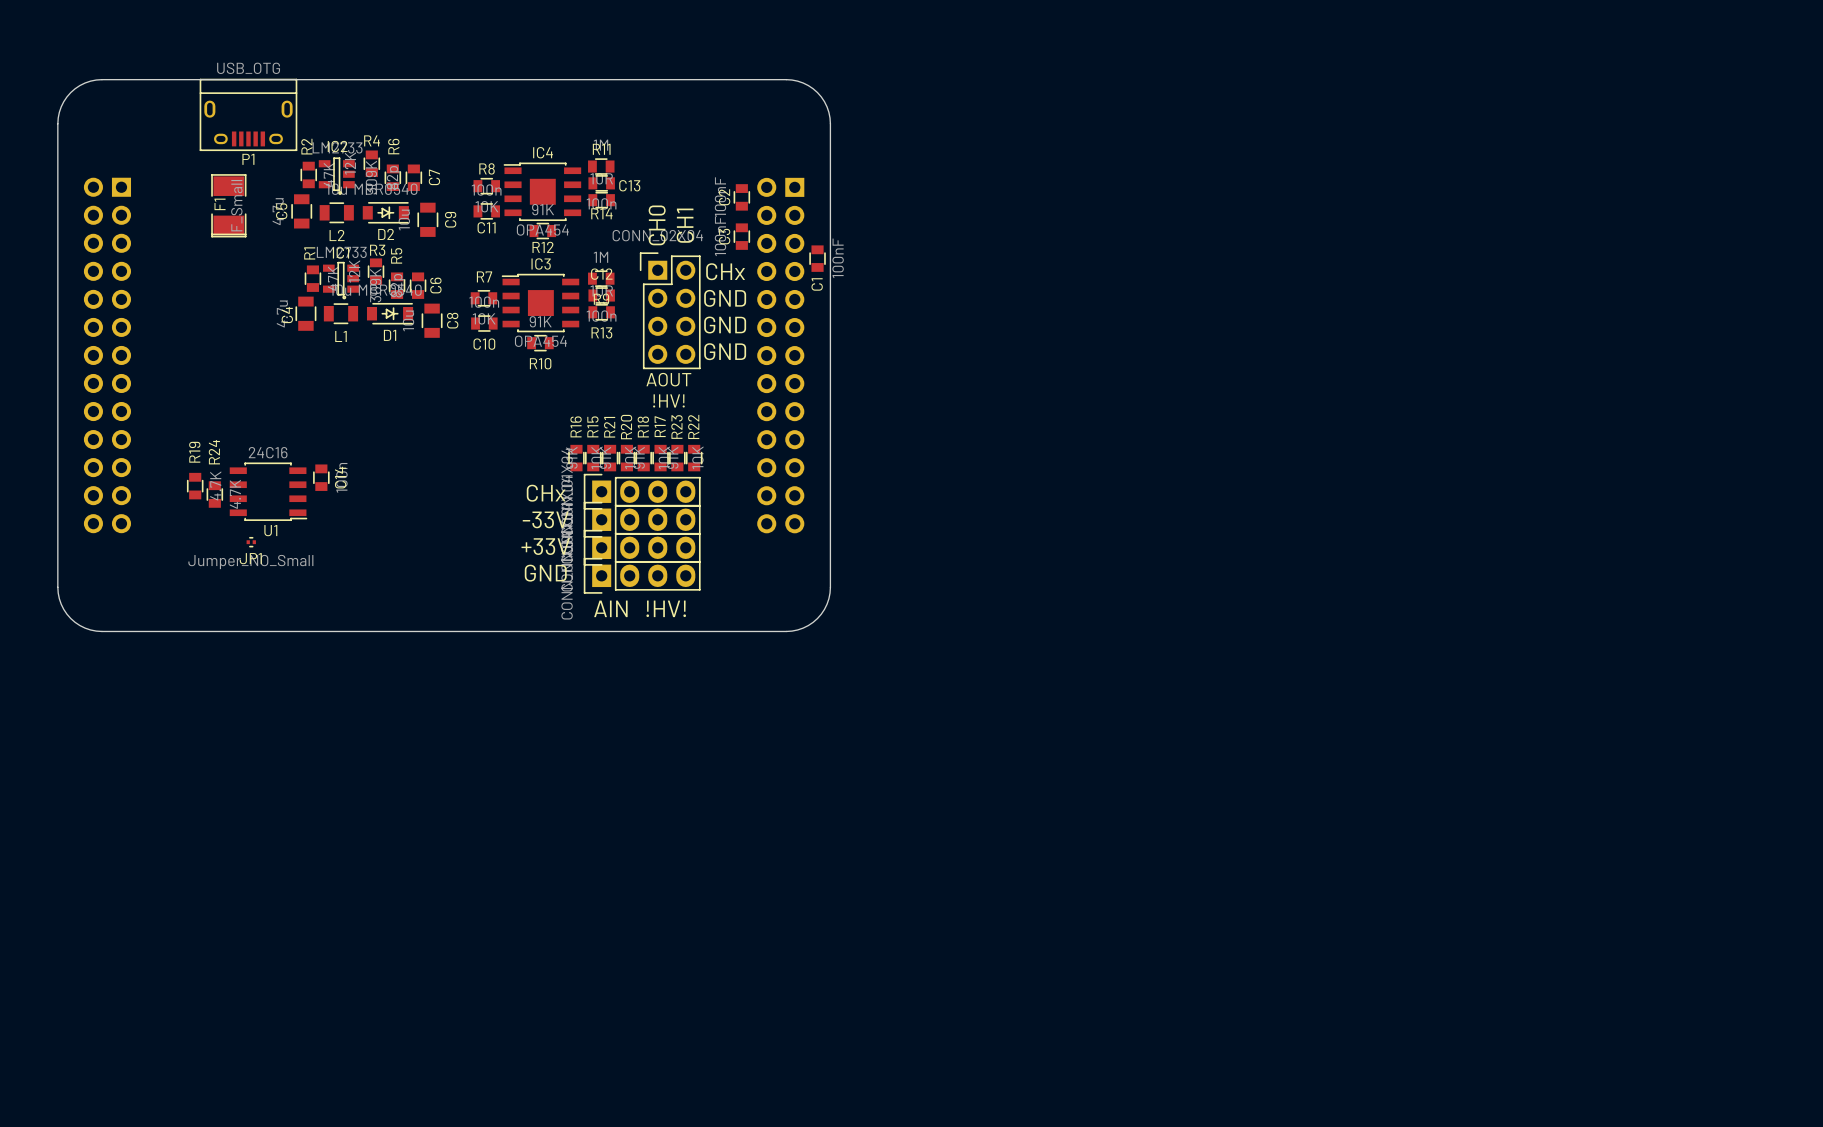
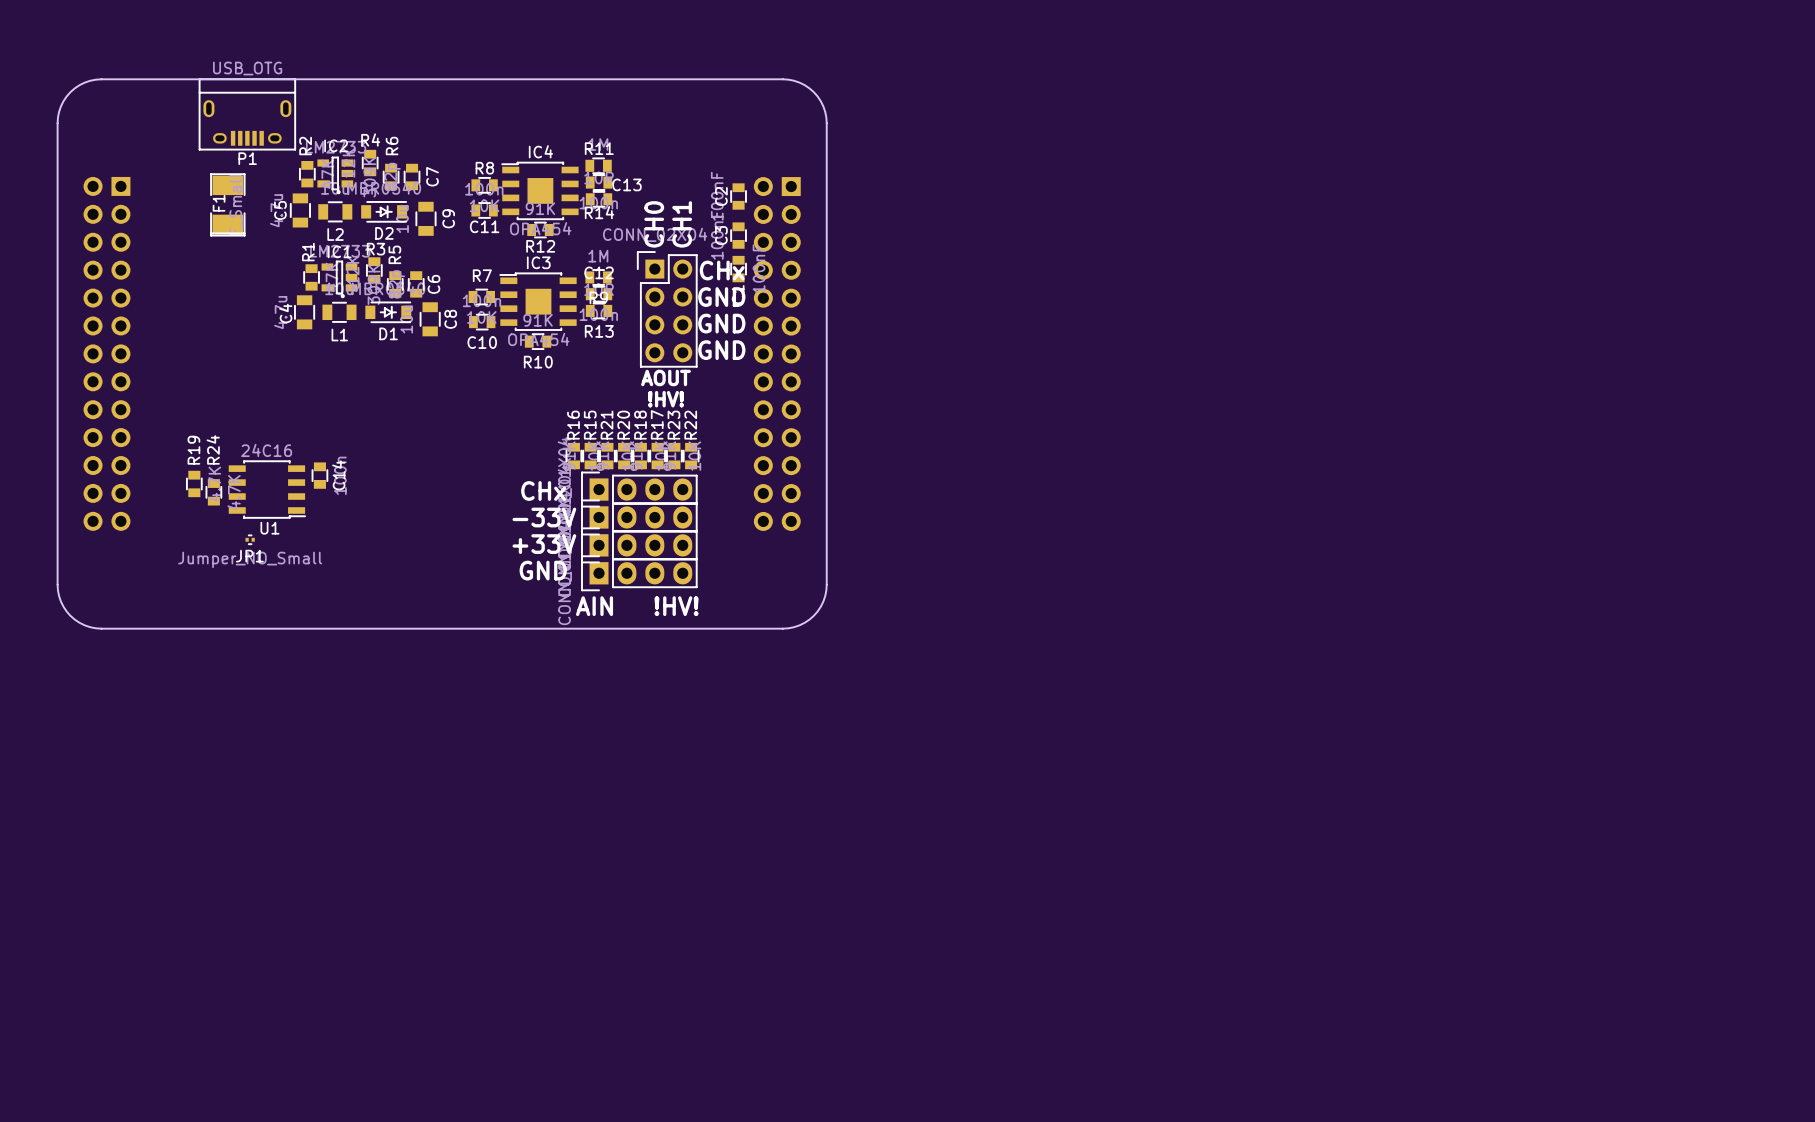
C1 position: (817, 258) -> (738, 269)

